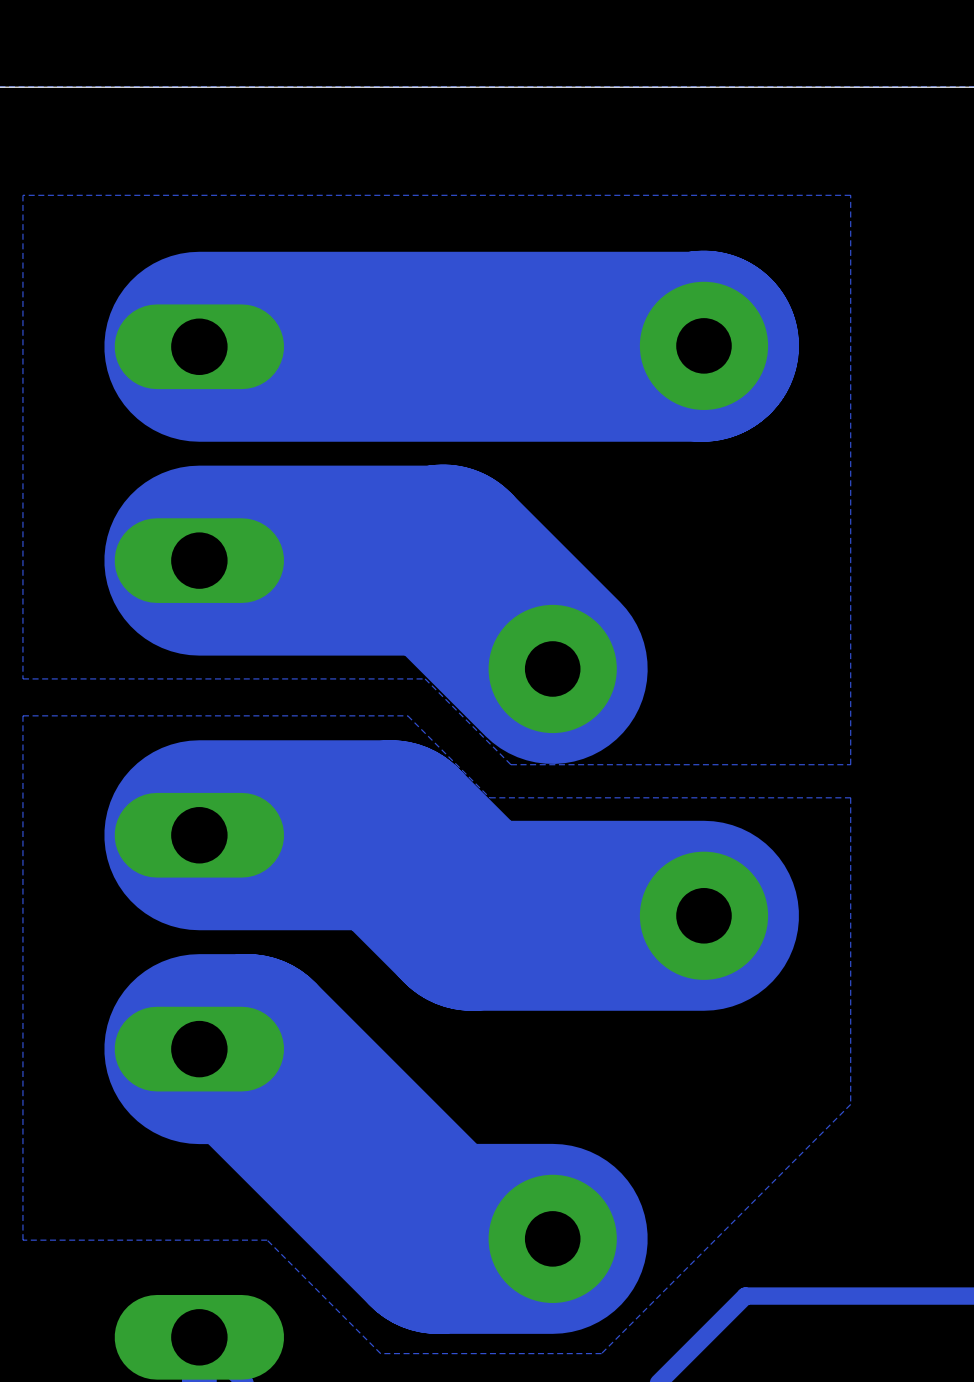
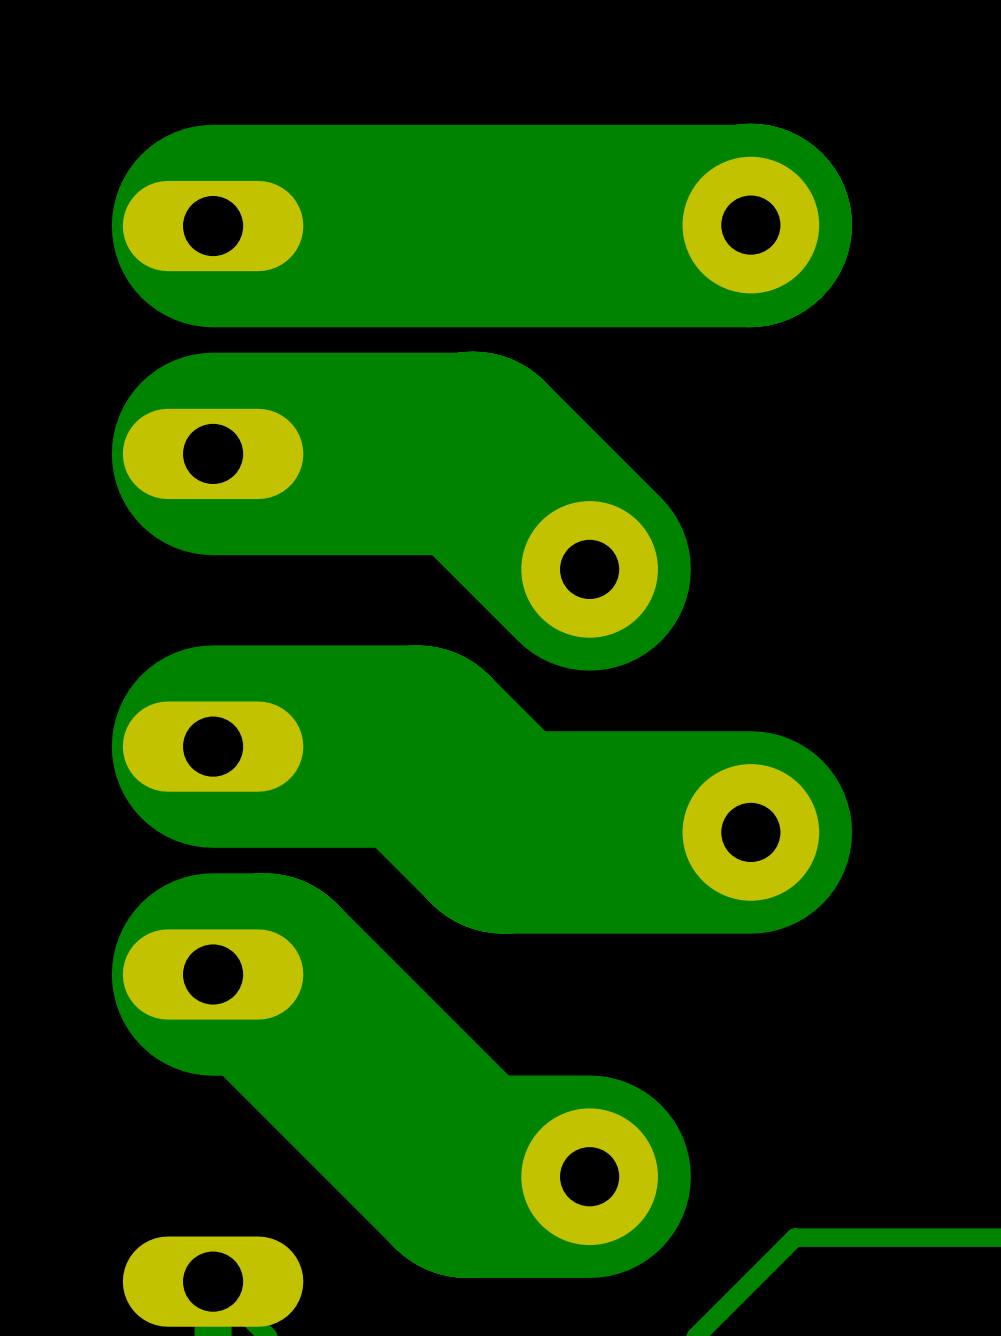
zone outline: (850, 195) (22, 195) (22, 678) (425, 678) (510, 764) (850, 764) (850, 195) -> none
zone outline: (407, 715) (22, 715) (22, 1240) (267, 1240) (380, 1353) (601, 1353) (850, 1104) (850, 797) (489, 797) (407, 715) -> none

